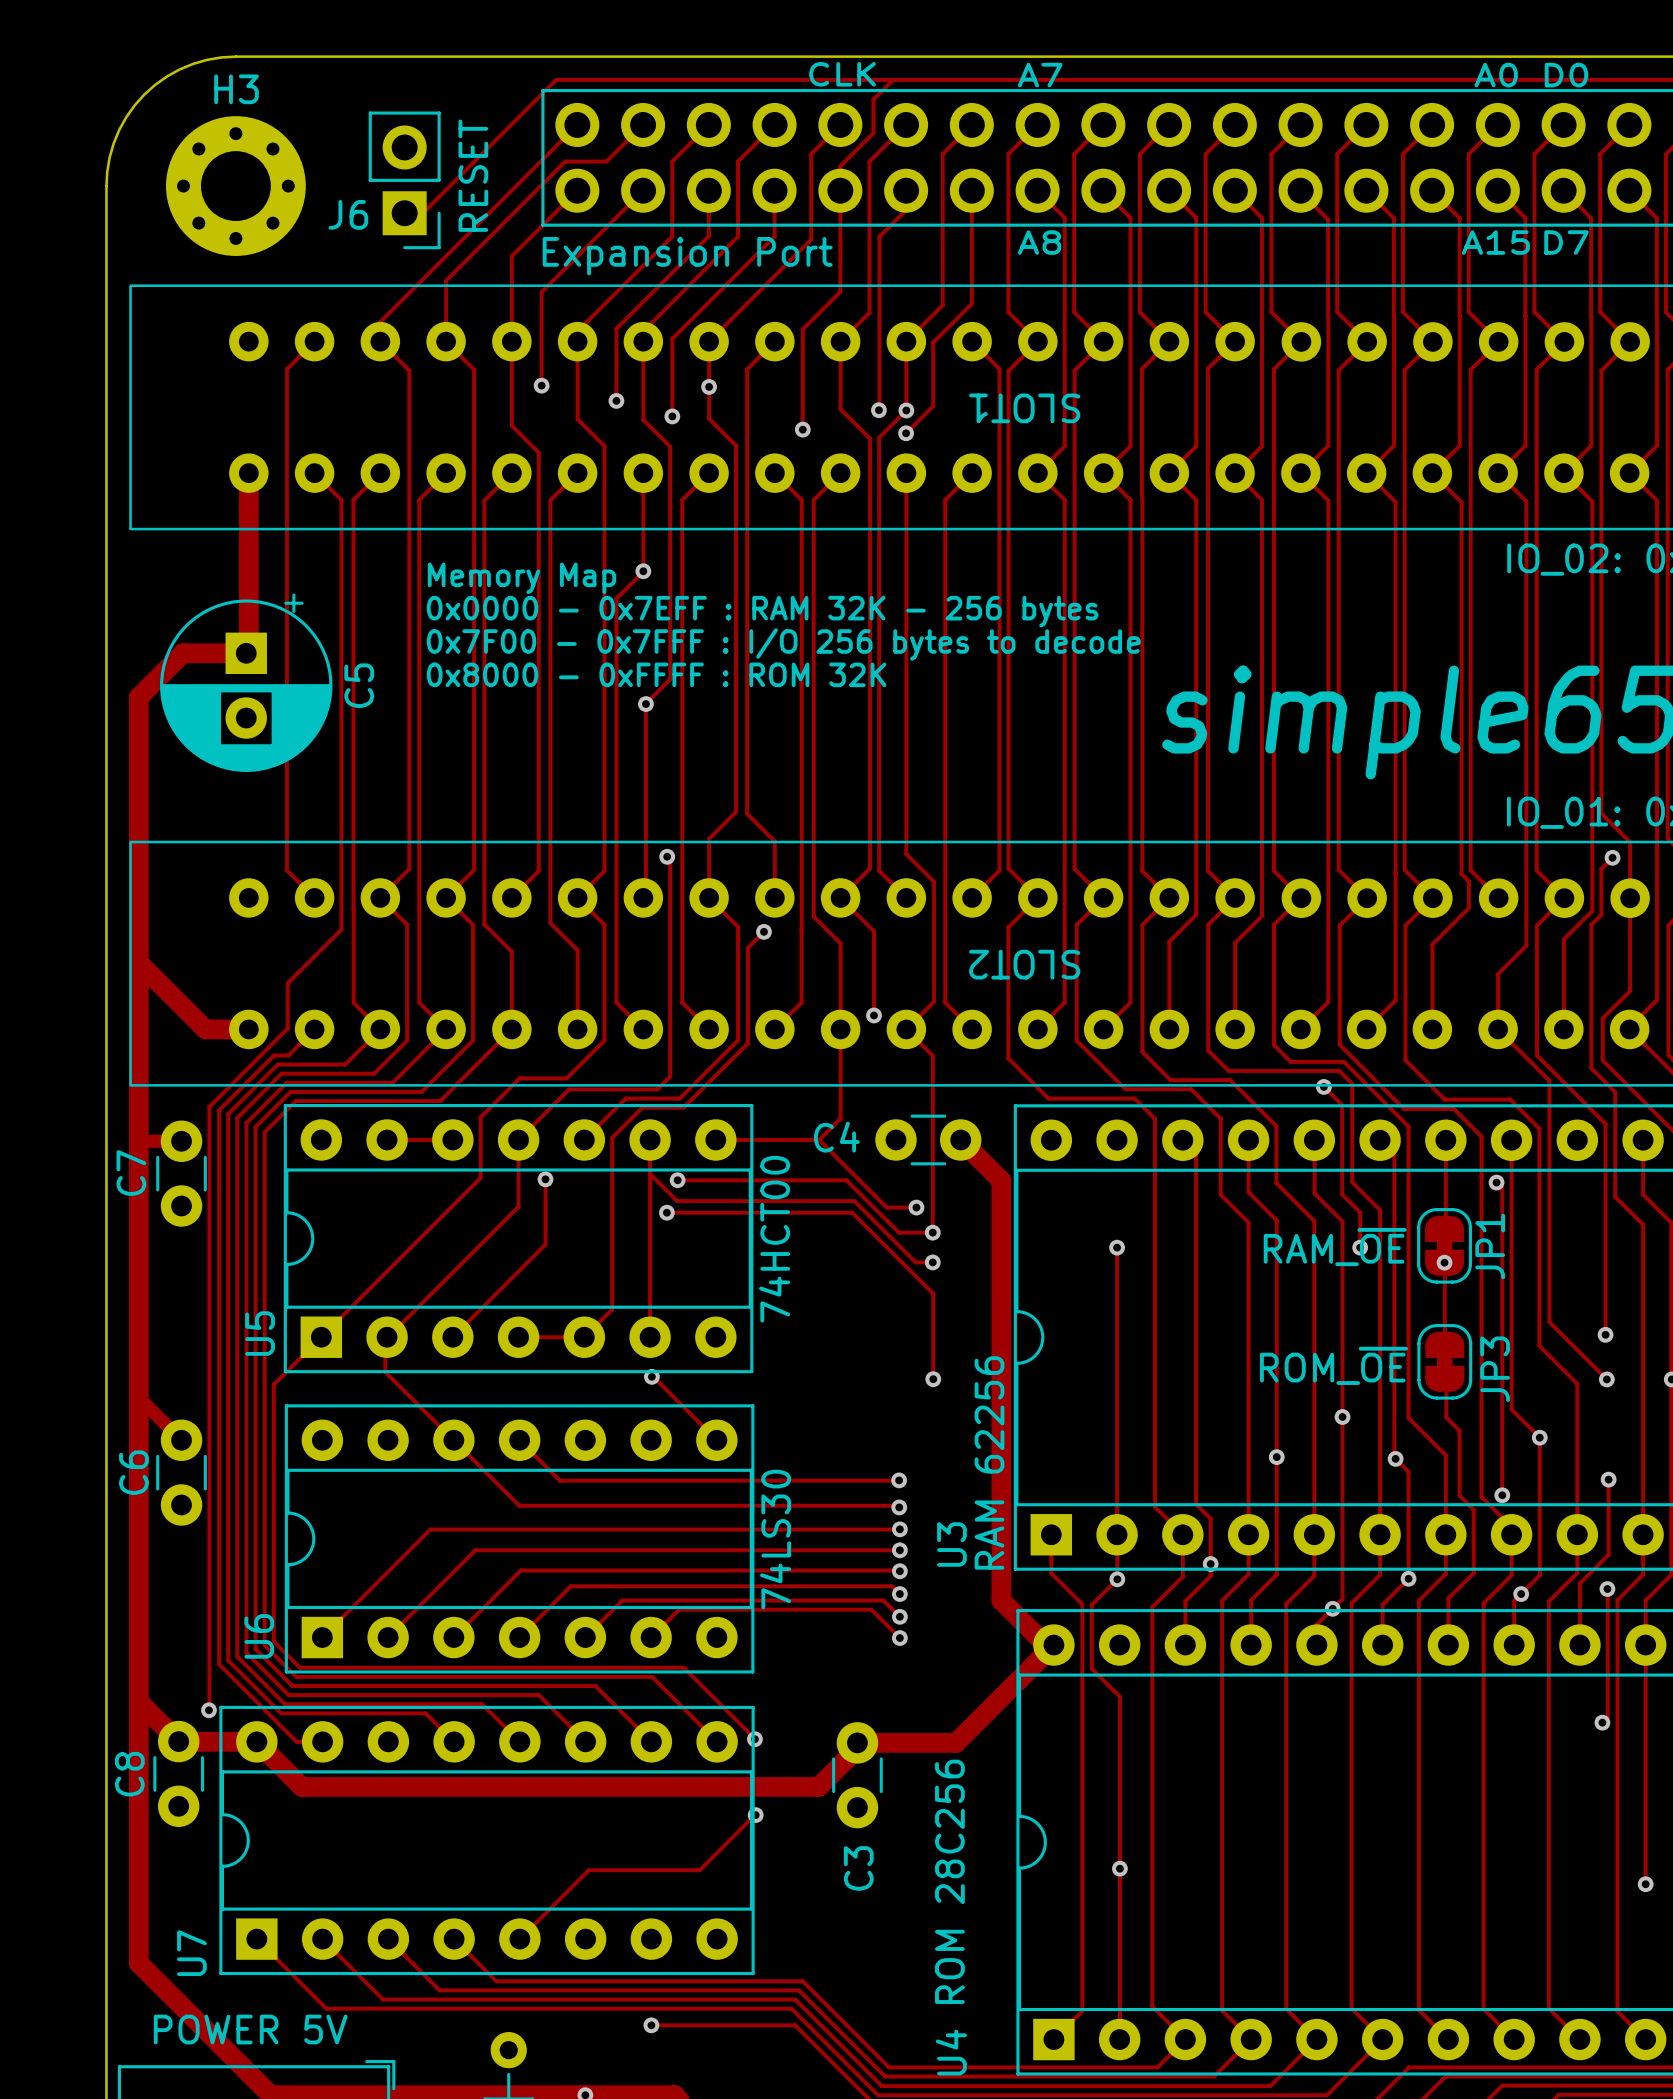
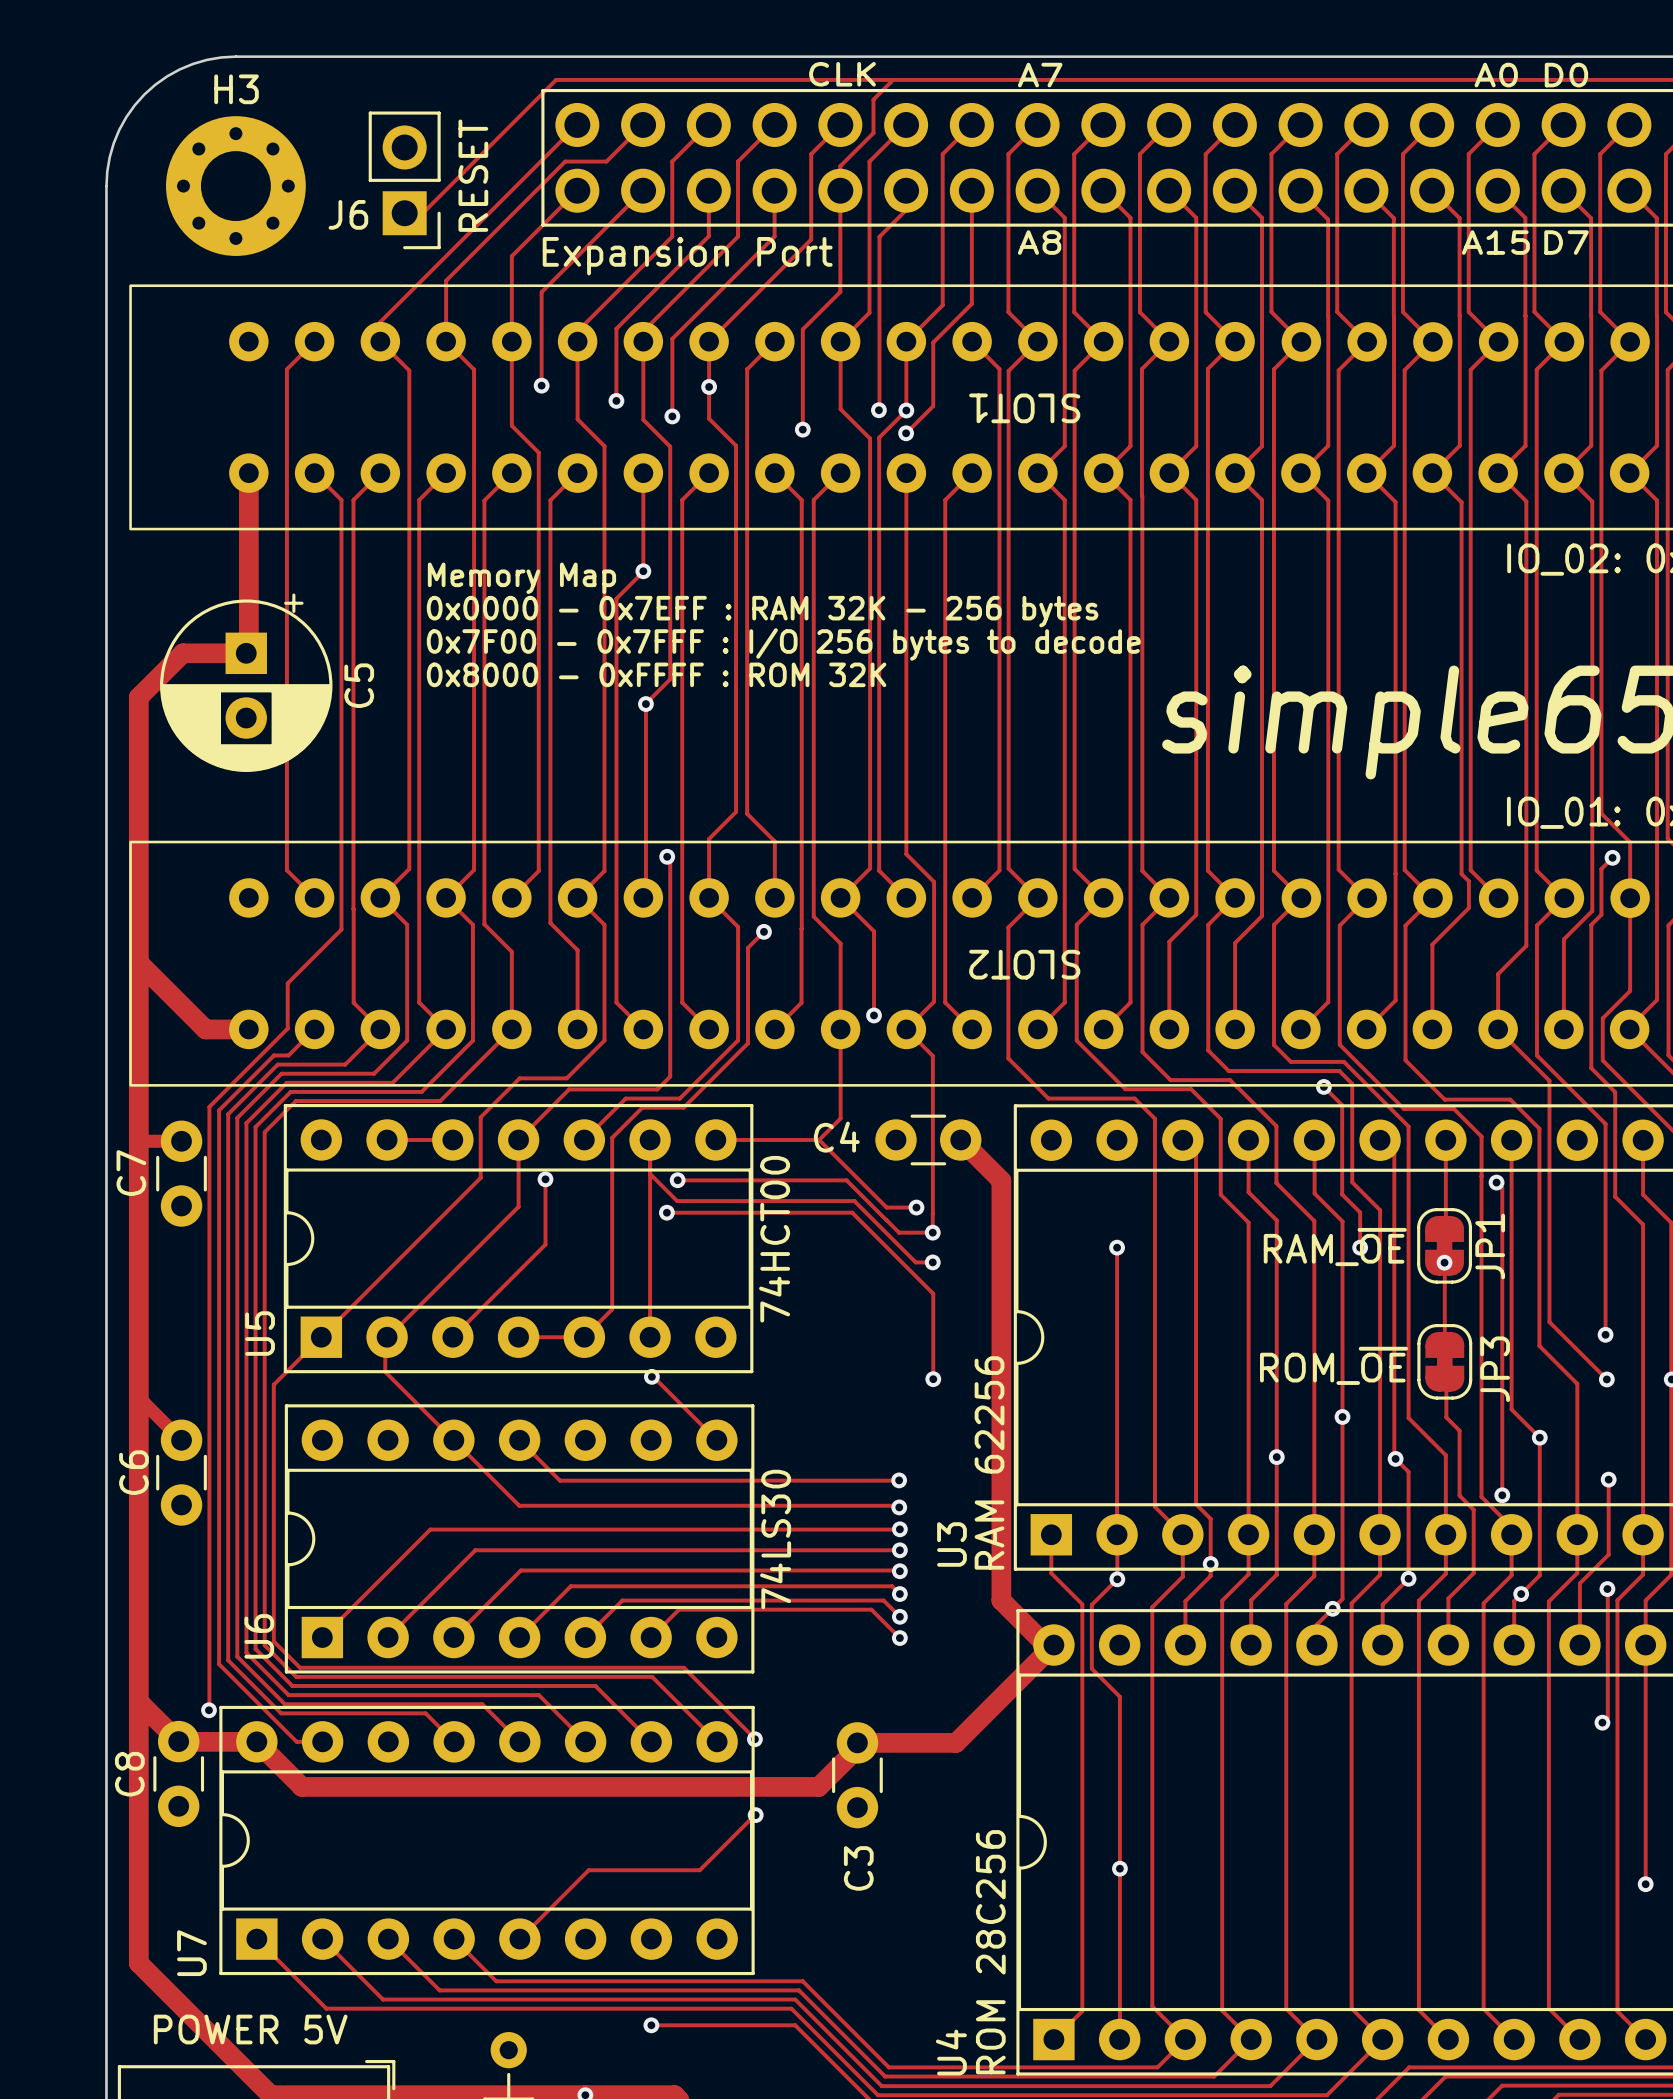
U4 value position: ROM 28C256 (949, 1881) -> ROM 28C256 (990, 1952)

